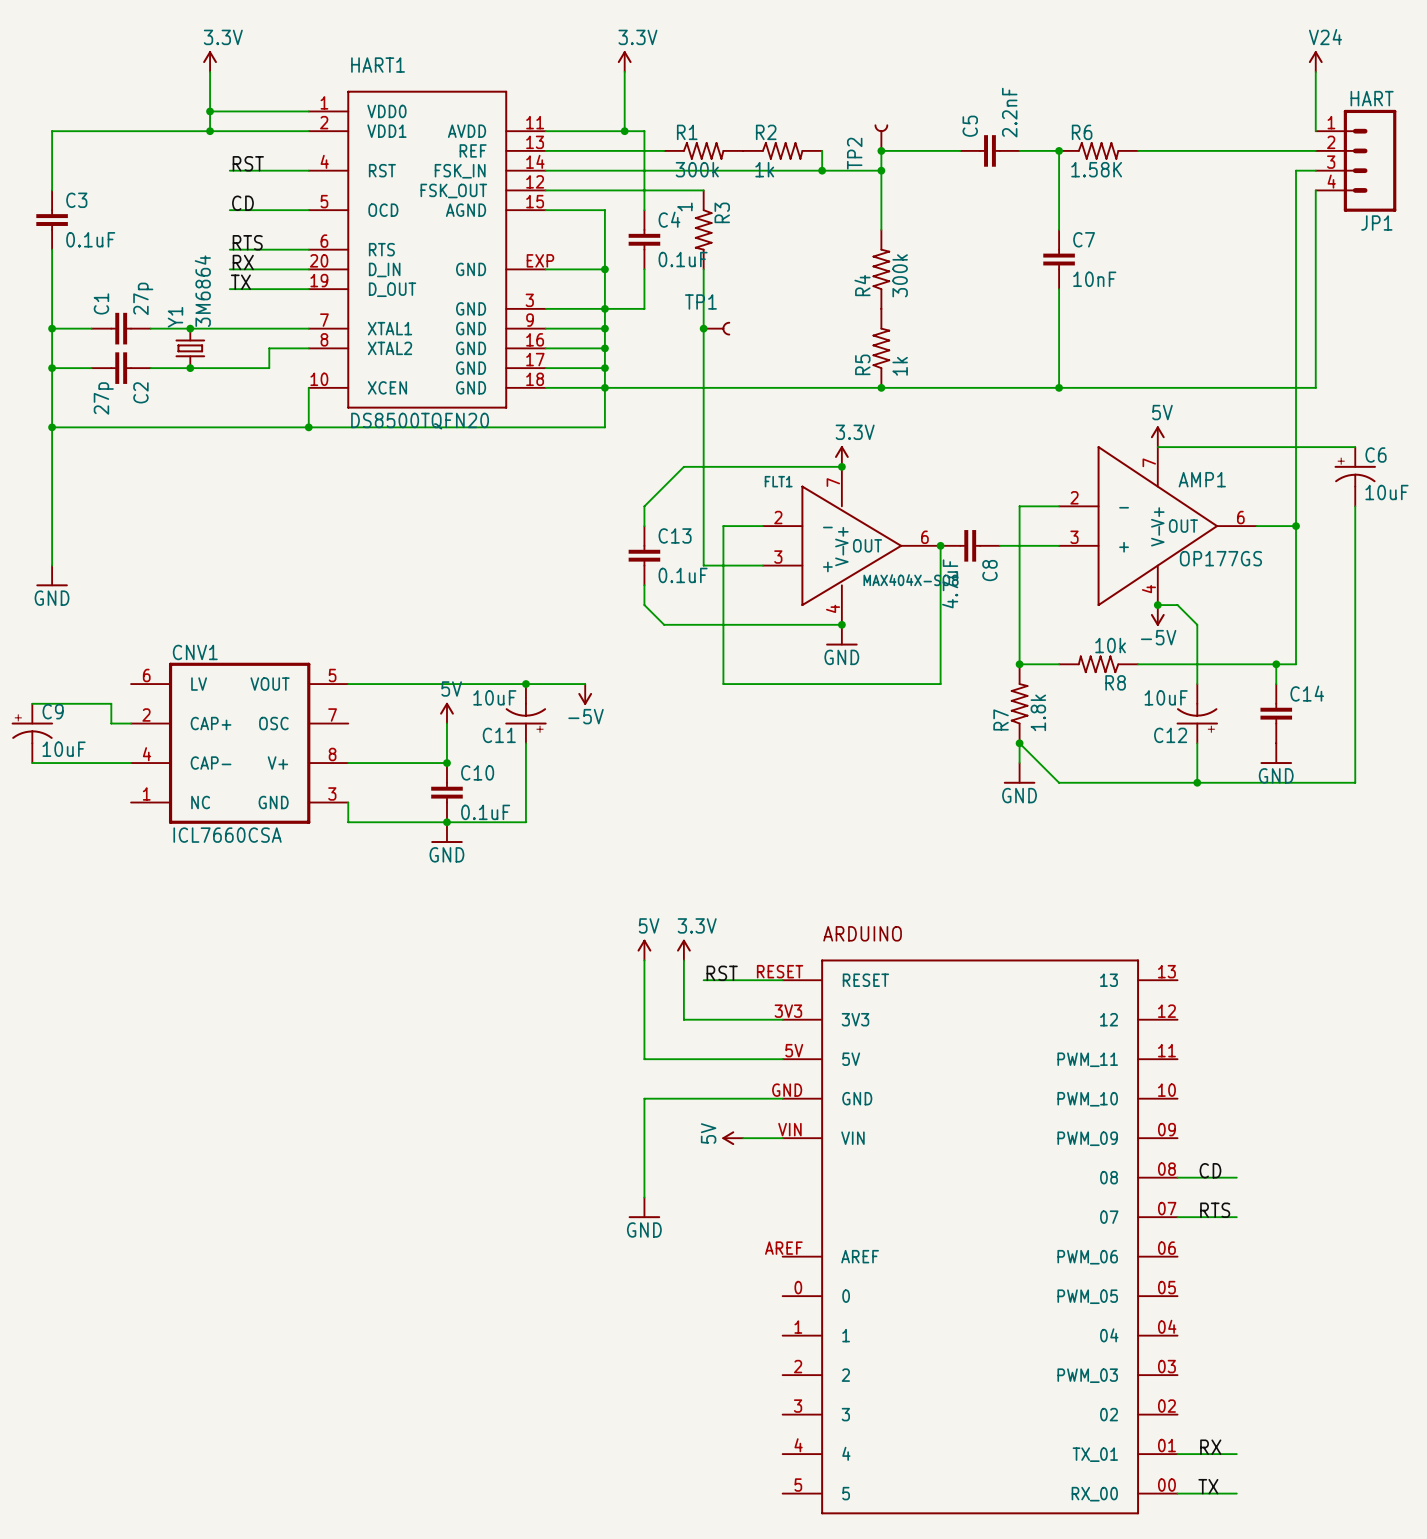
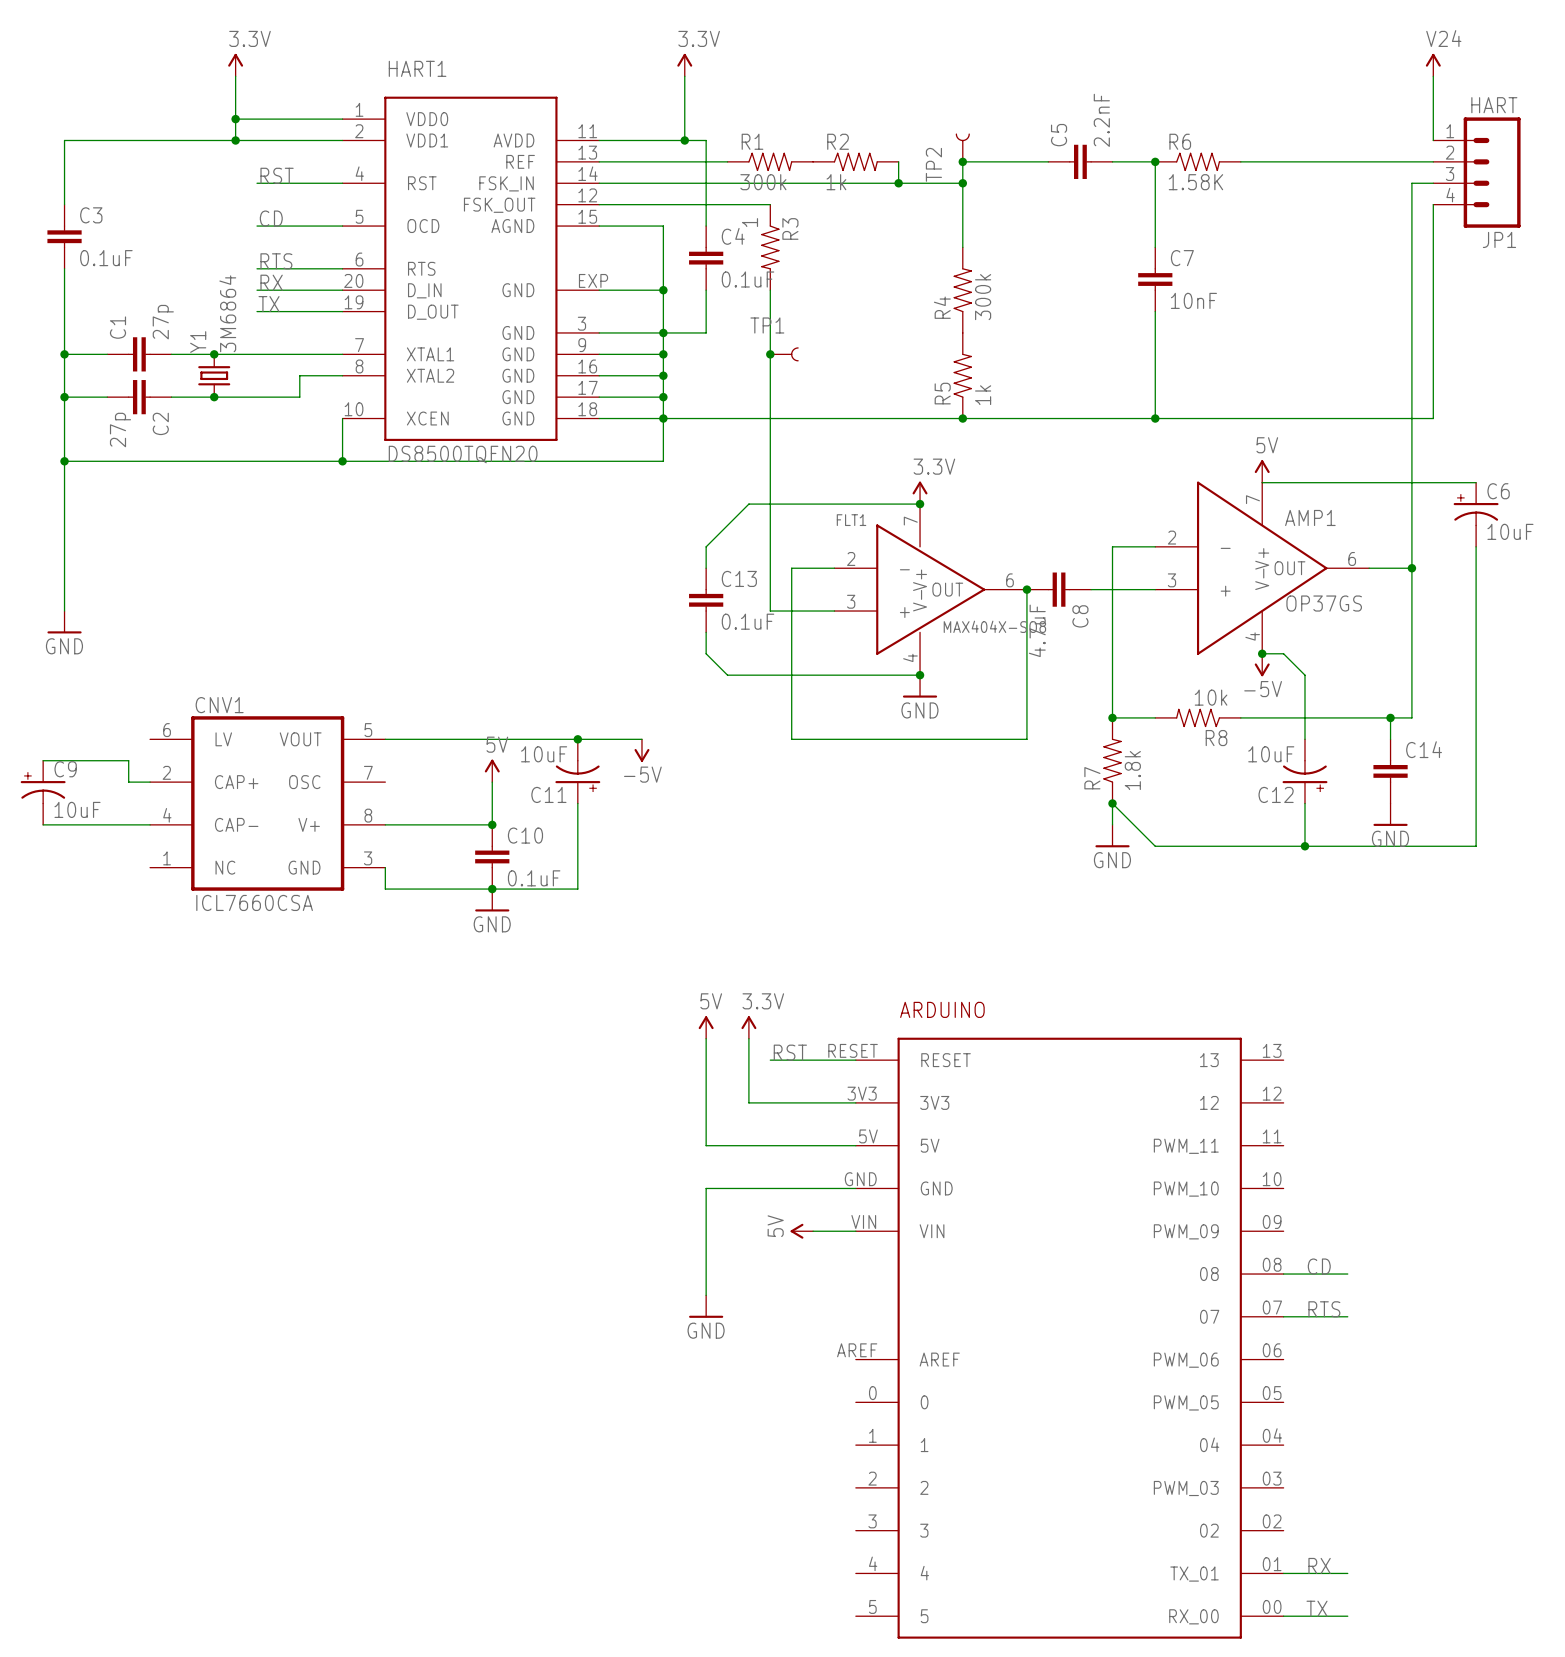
AMP1 value: OP177GS (1220, 558) -> OP37GS (1324, 603)

